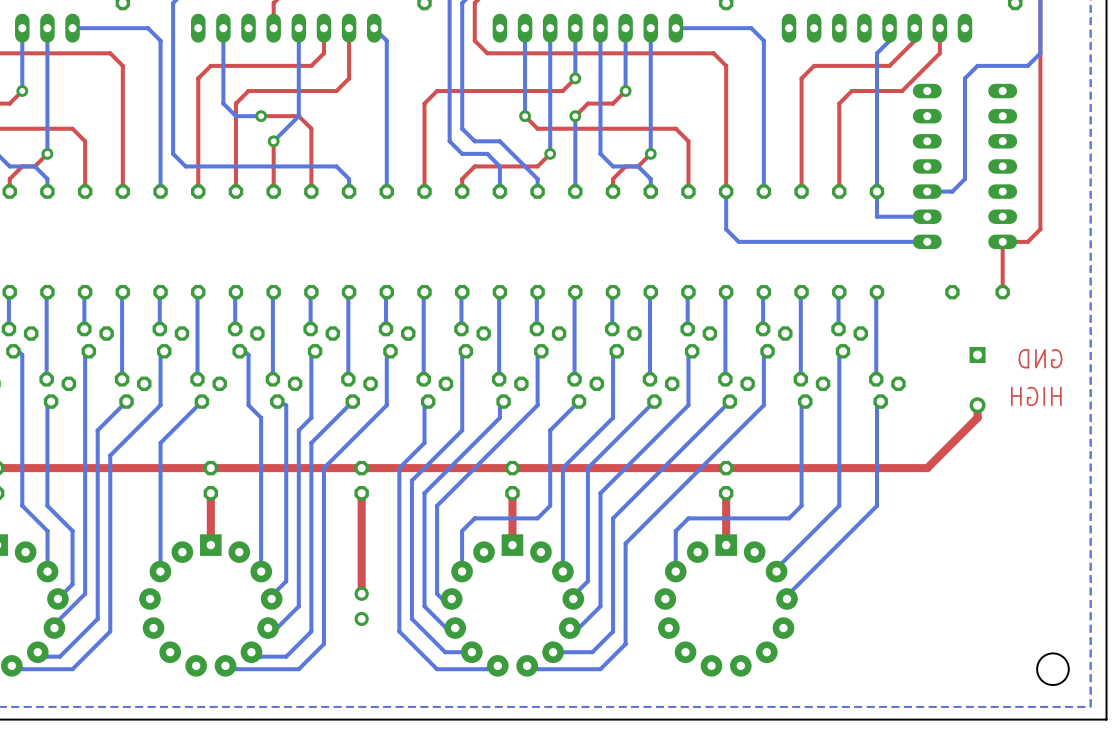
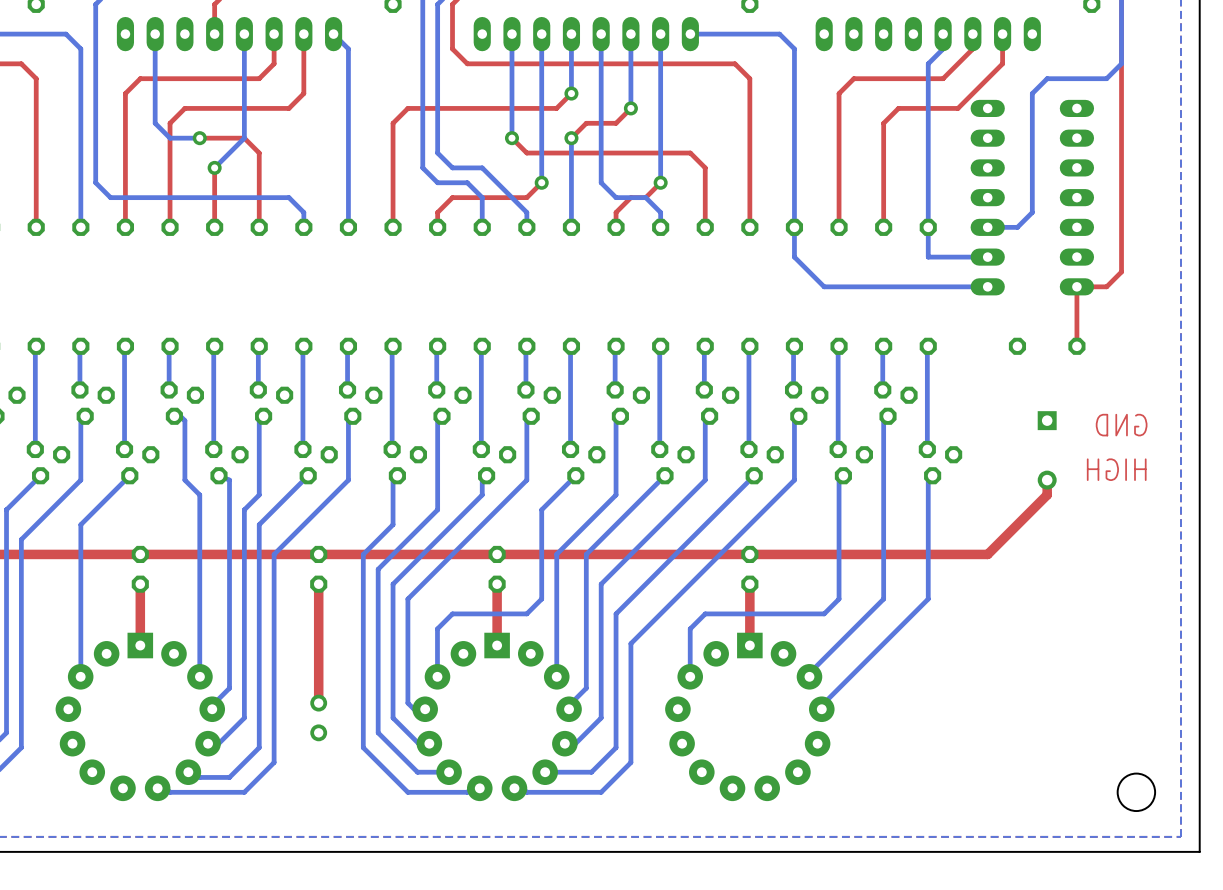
bottom track: (726, 191) (726, 229) (738, 241) (789, 241) -> (794, 227) (794, 257) (824, 286)

